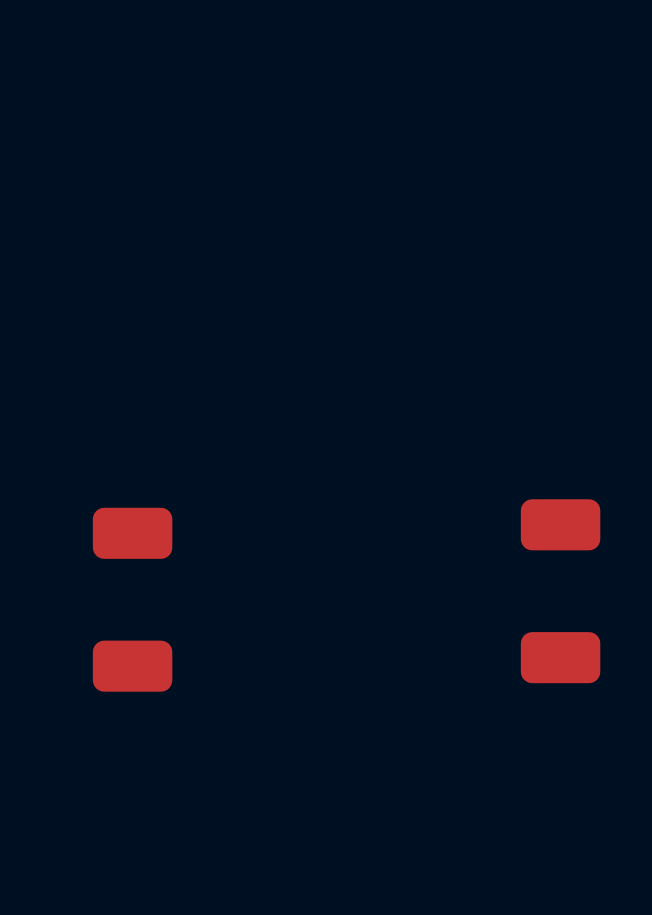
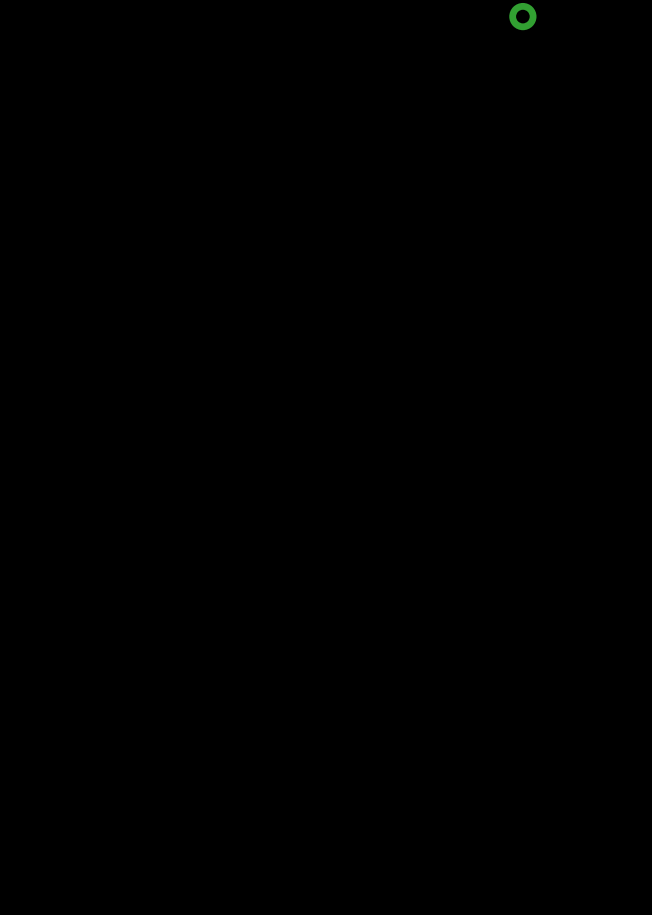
via: none -> (522, 16)
part: (560, 591) -> none
part: (132, 599) -> none

